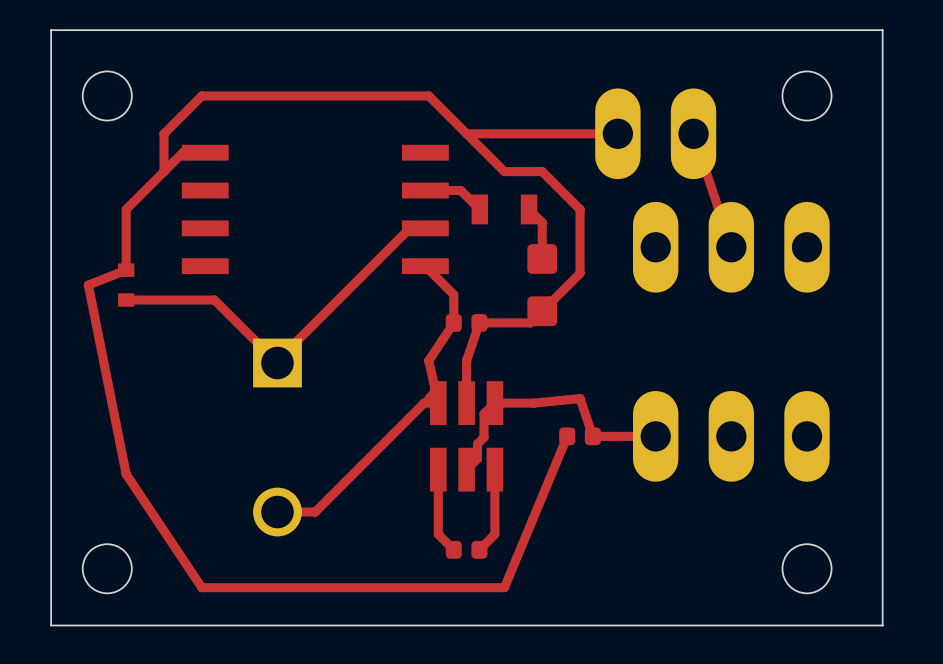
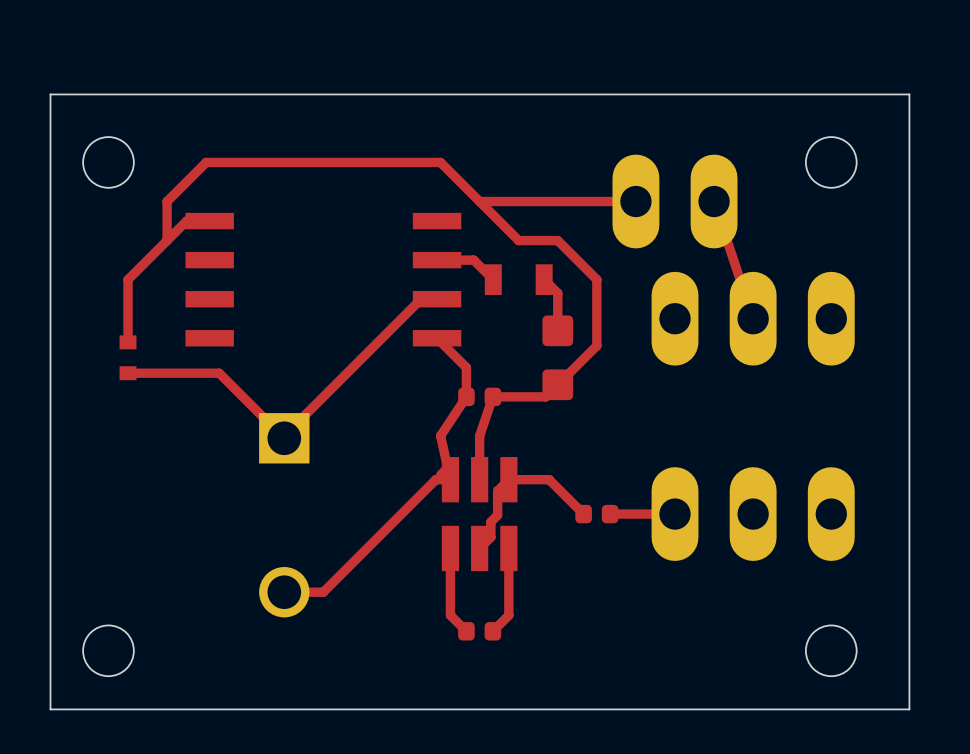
top track: (126, 270) (88, 285) (126, 474) (201, 587) (504, 587) (567, 436) -> none
top track: (533, 403) (580, 398) (592, 436) -> (549, 479) (583, 514)

